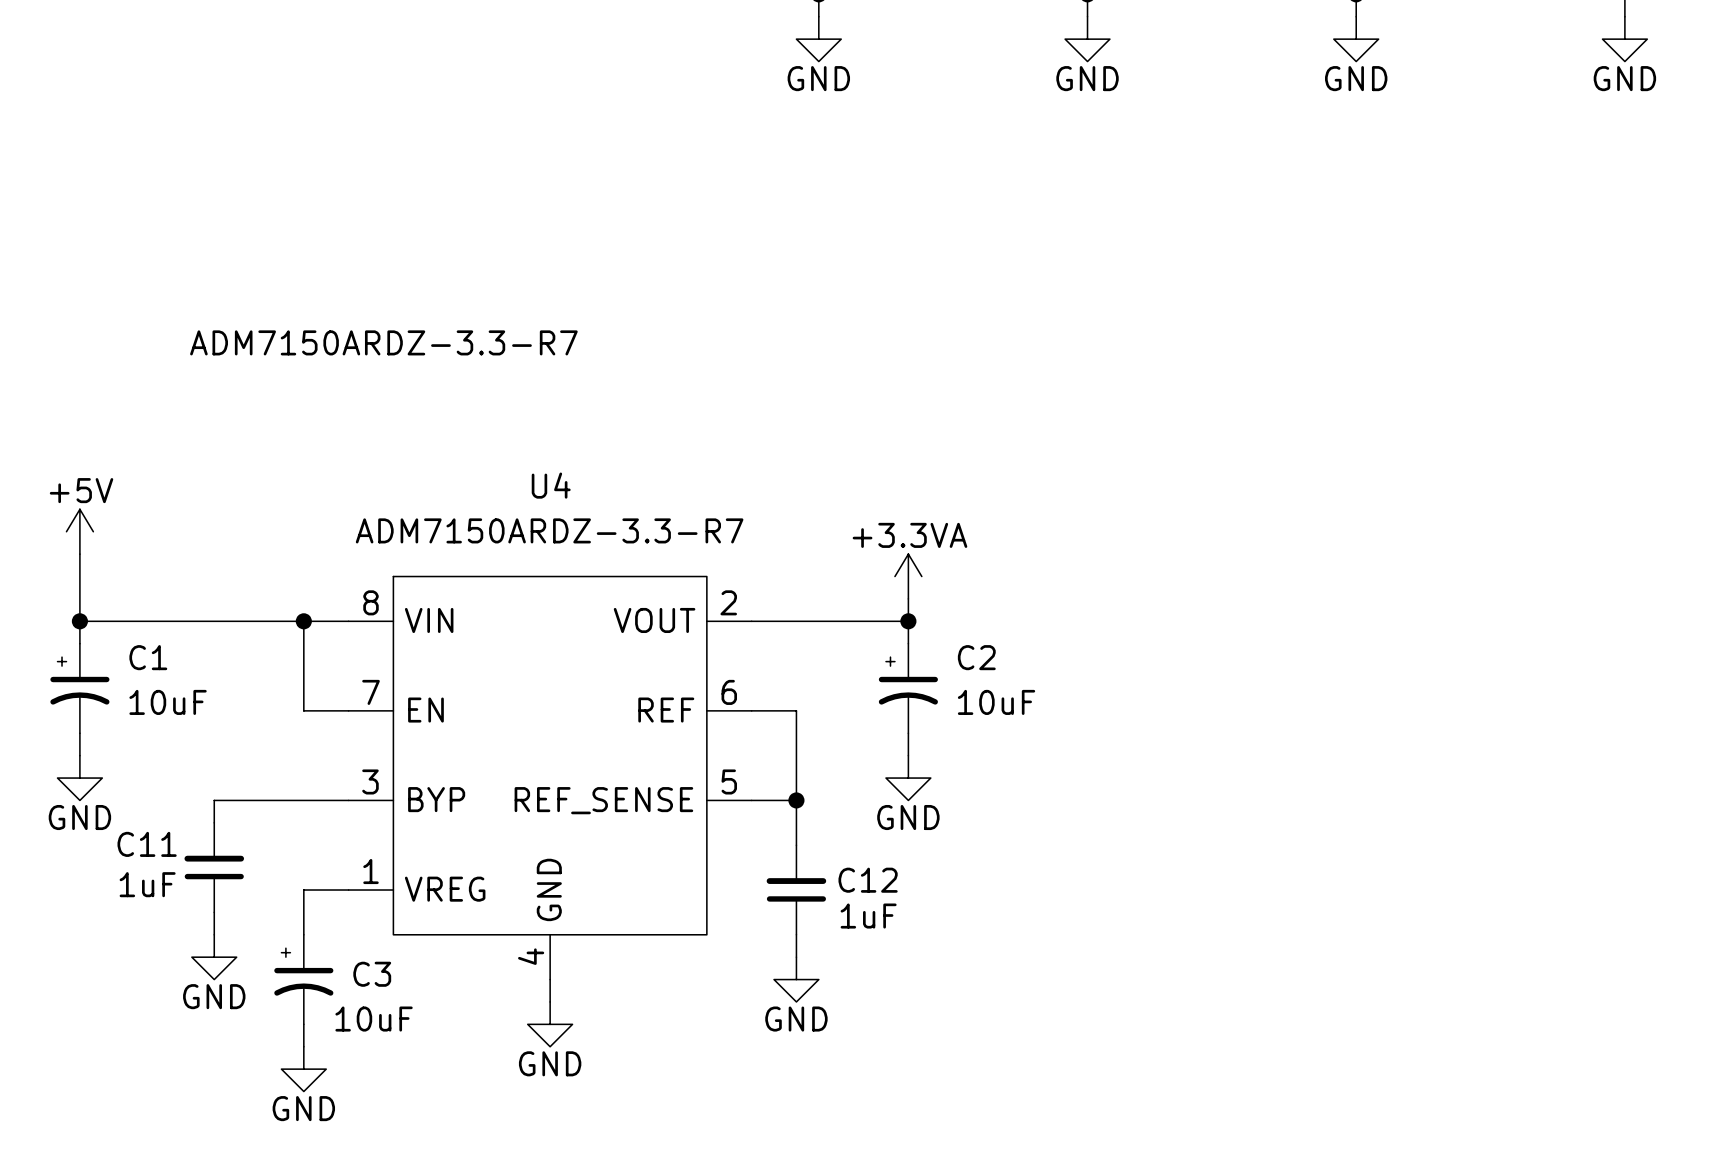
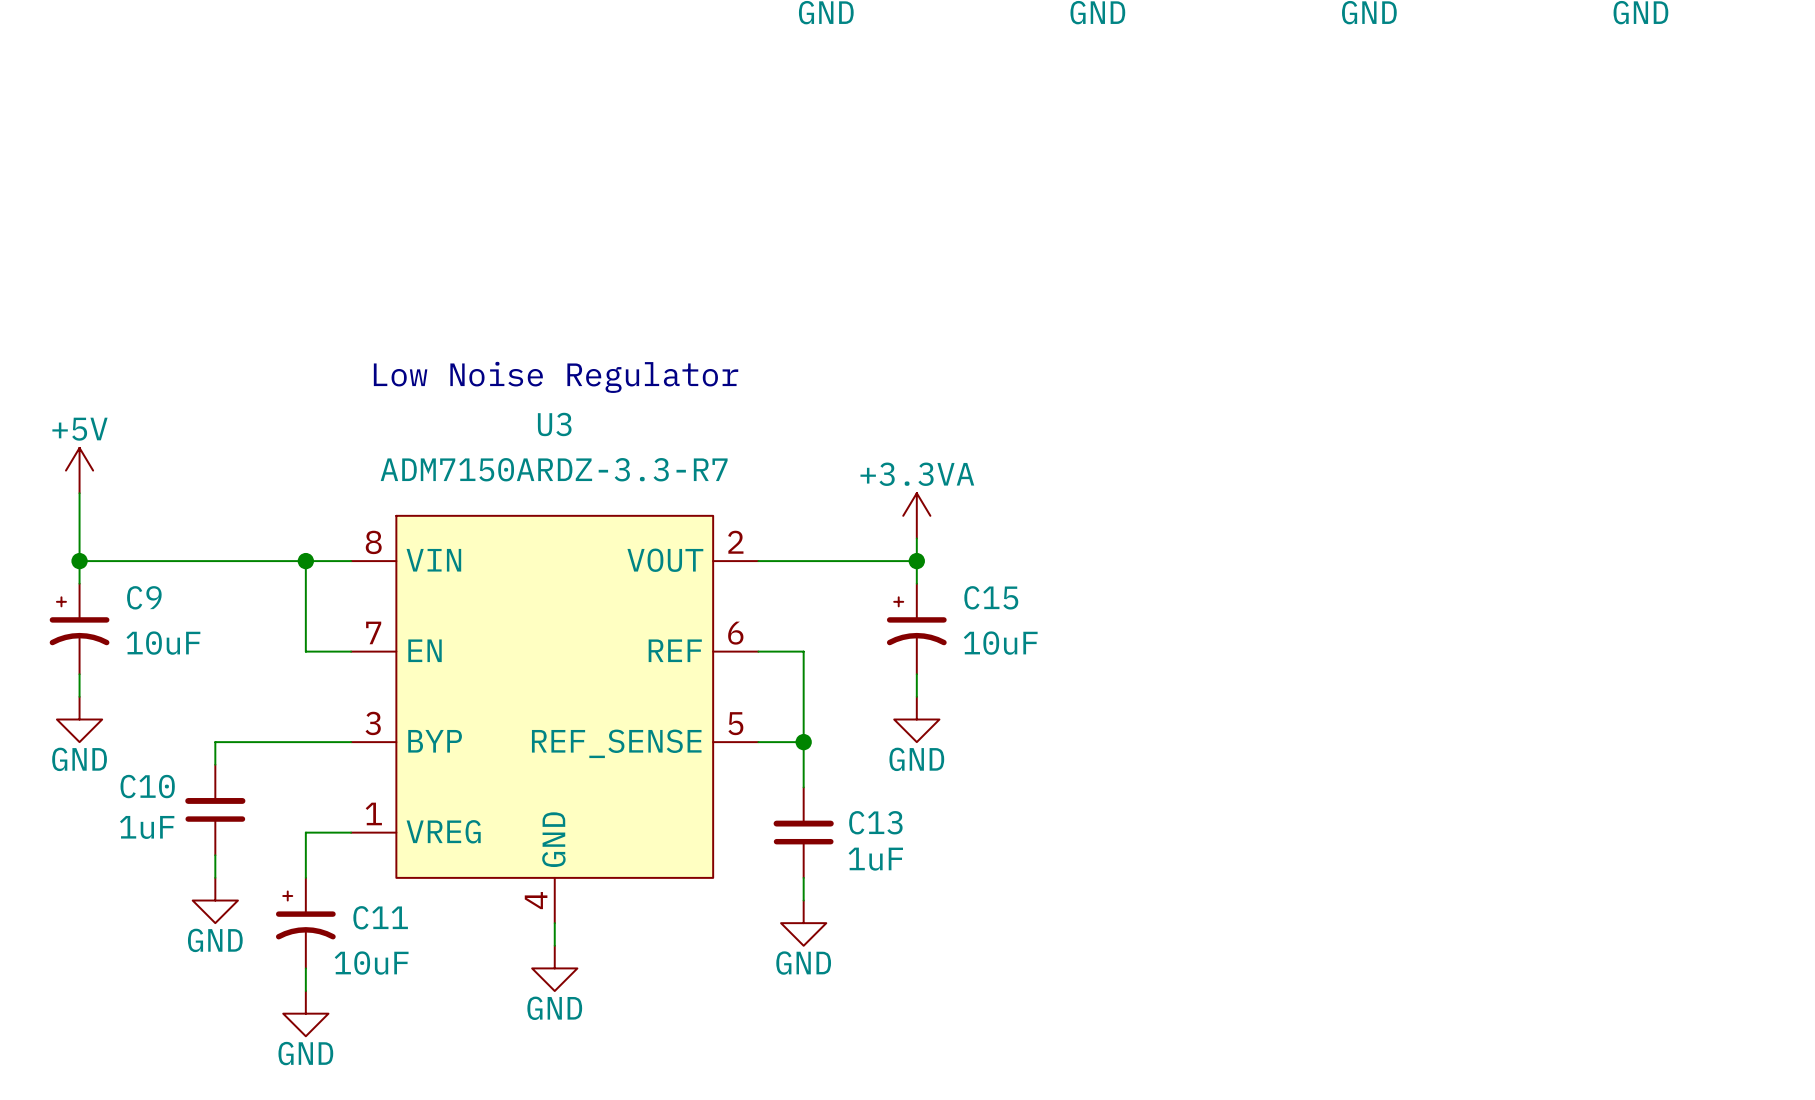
text: ADM7150ARDZ-3.3-R7 (383, 342) -> none
text: none -> Low Noise Regulator (556, 377)
U4 name: U4 (551, 485) -> U3 (554, 424)
C1 name: C1 (148, 657) -> C9 (144, 597)
C2 name: C2 (976, 657) -> C15 (991, 597)
C11 name: C11 (147, 844) -> C10 (147, 786)
C12 name: C12 (868, 880) -> C13 (875, 822)
C3 name: C3 (372, 974) -> C11 (380, 917)

